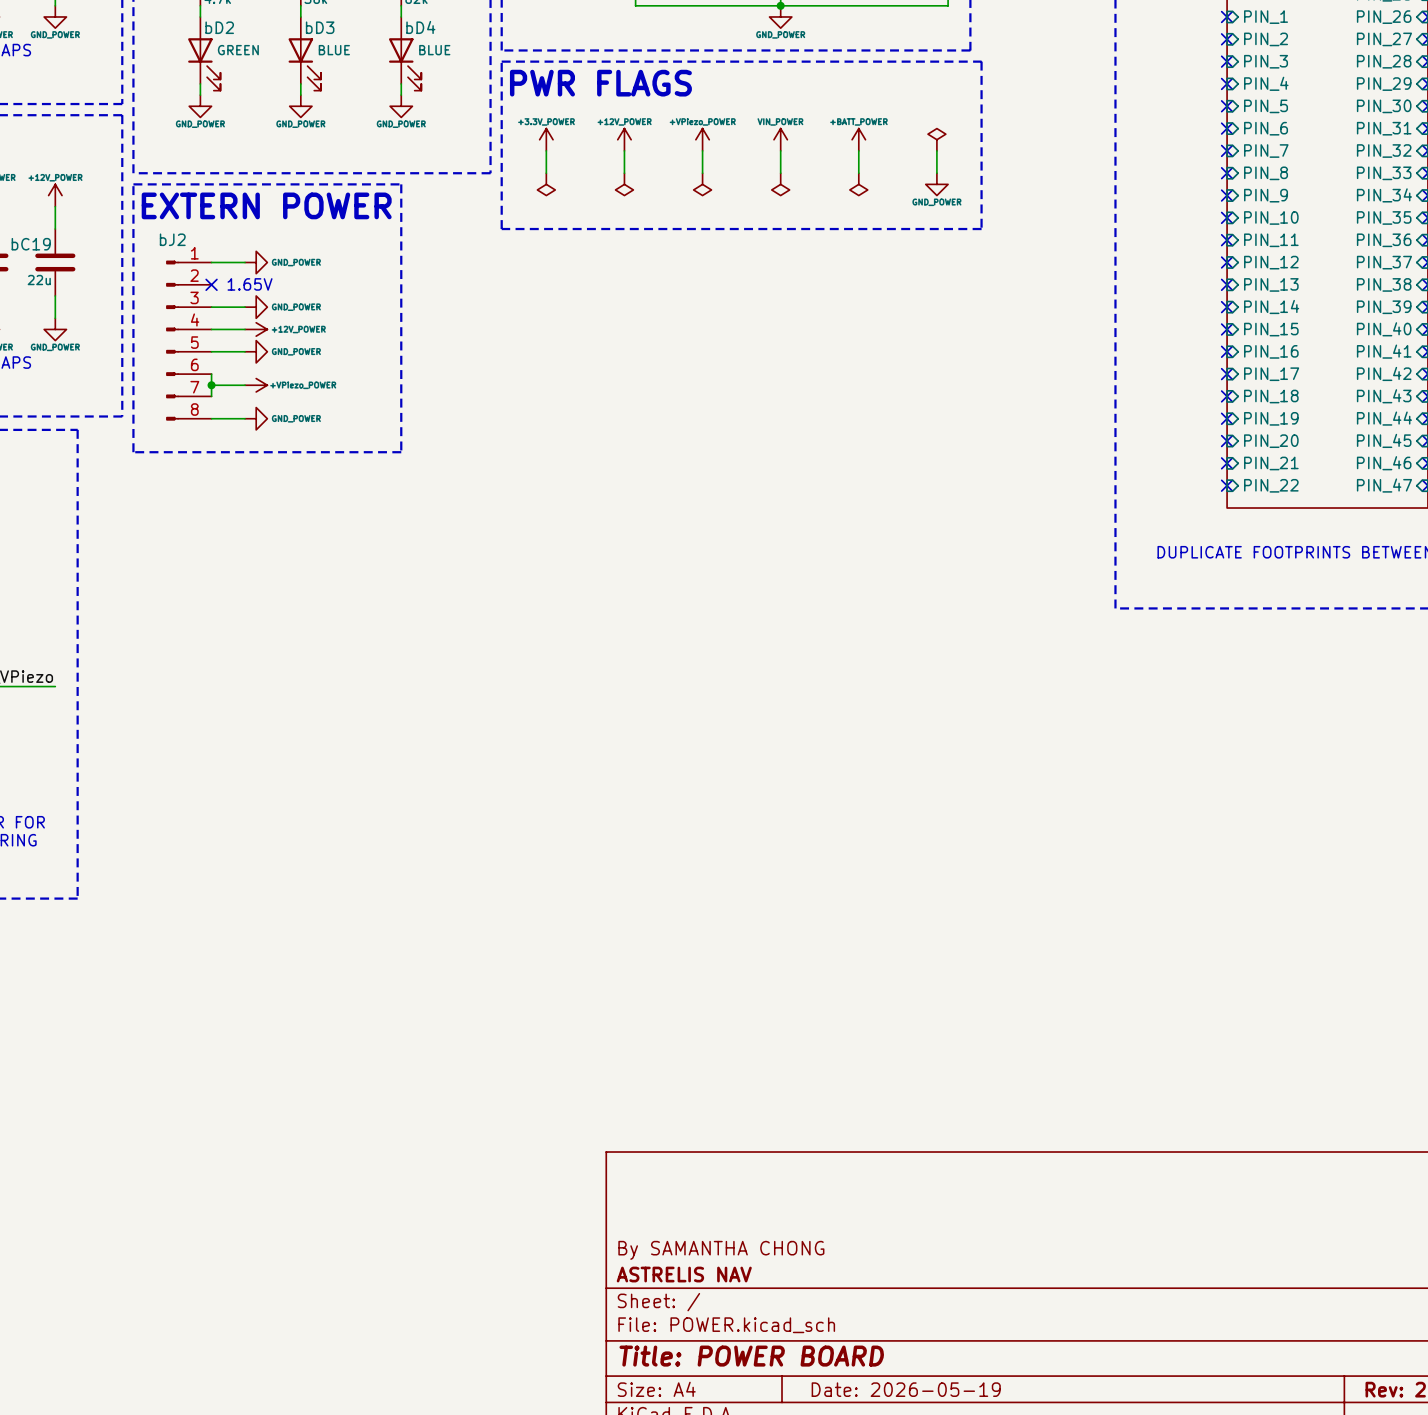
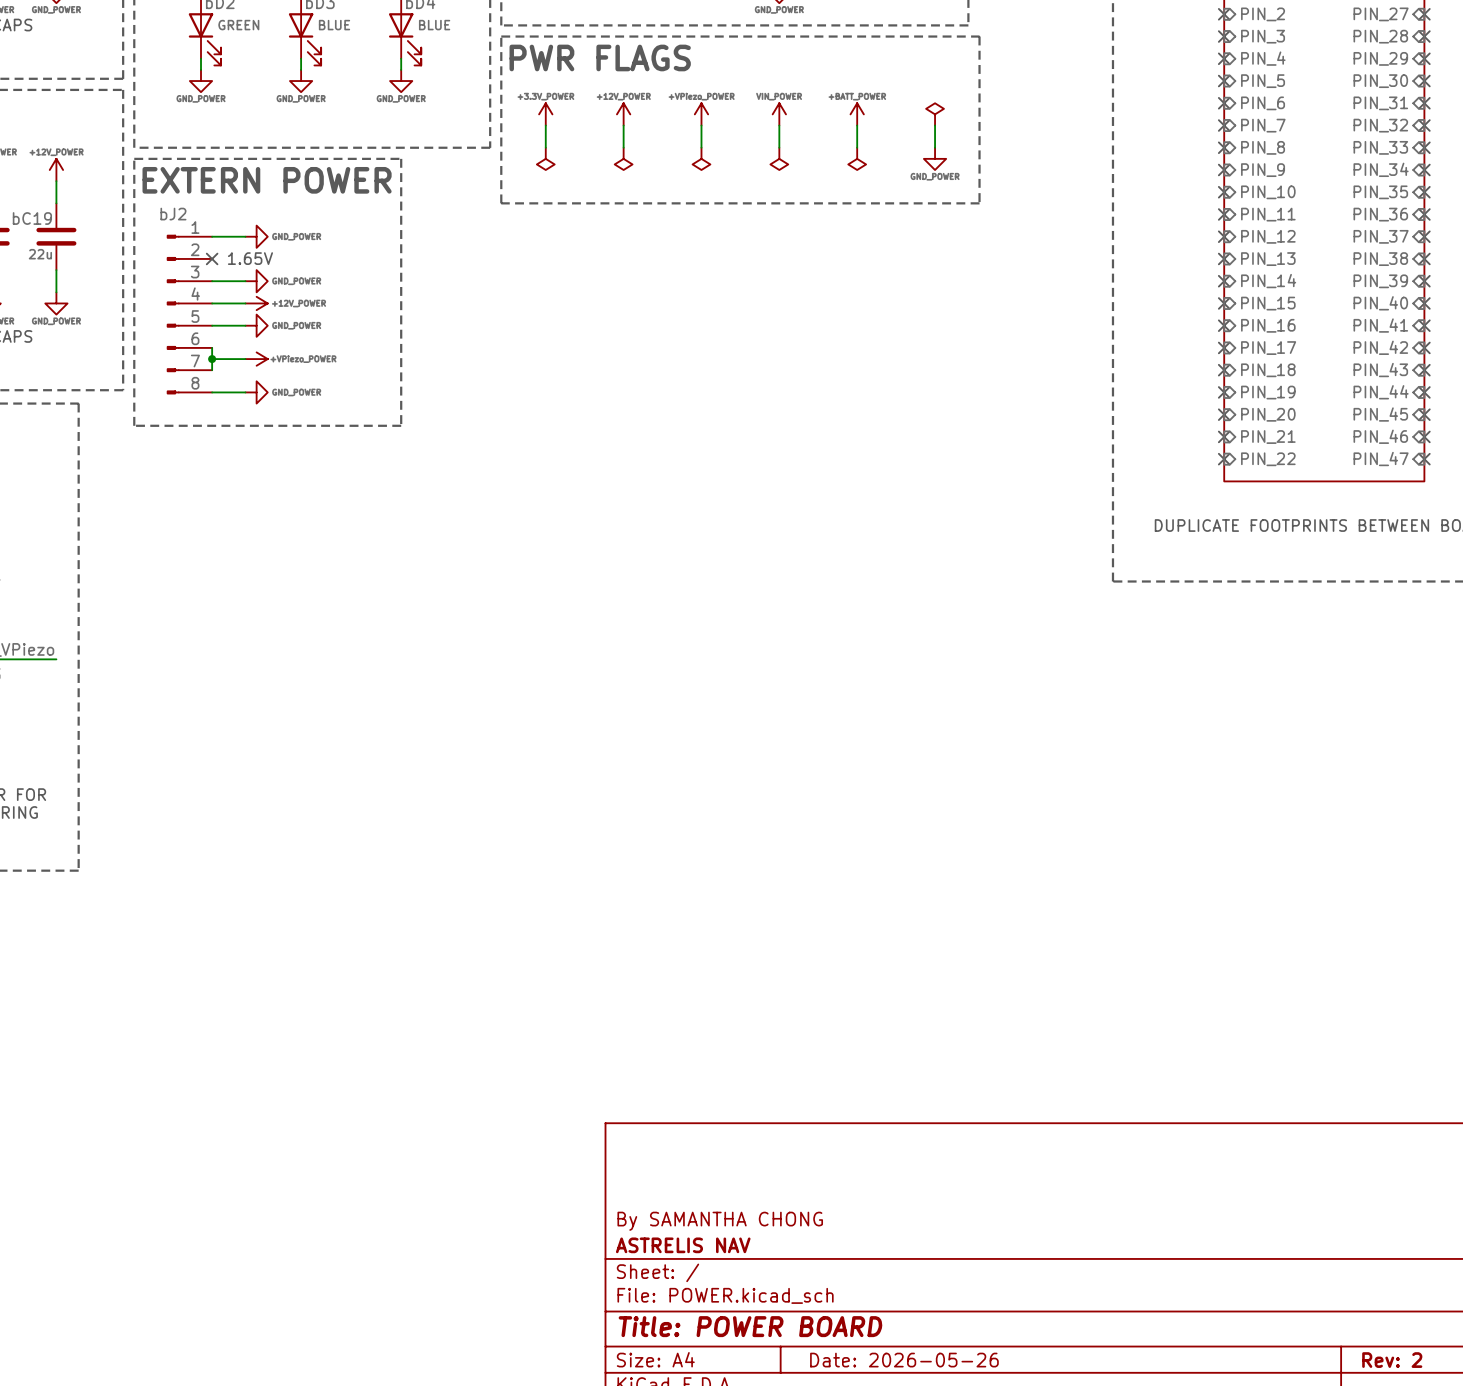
title block: Date: 2026-05-19 (906, 1389) -> Date: 2026-05-26 (904, 1360)

